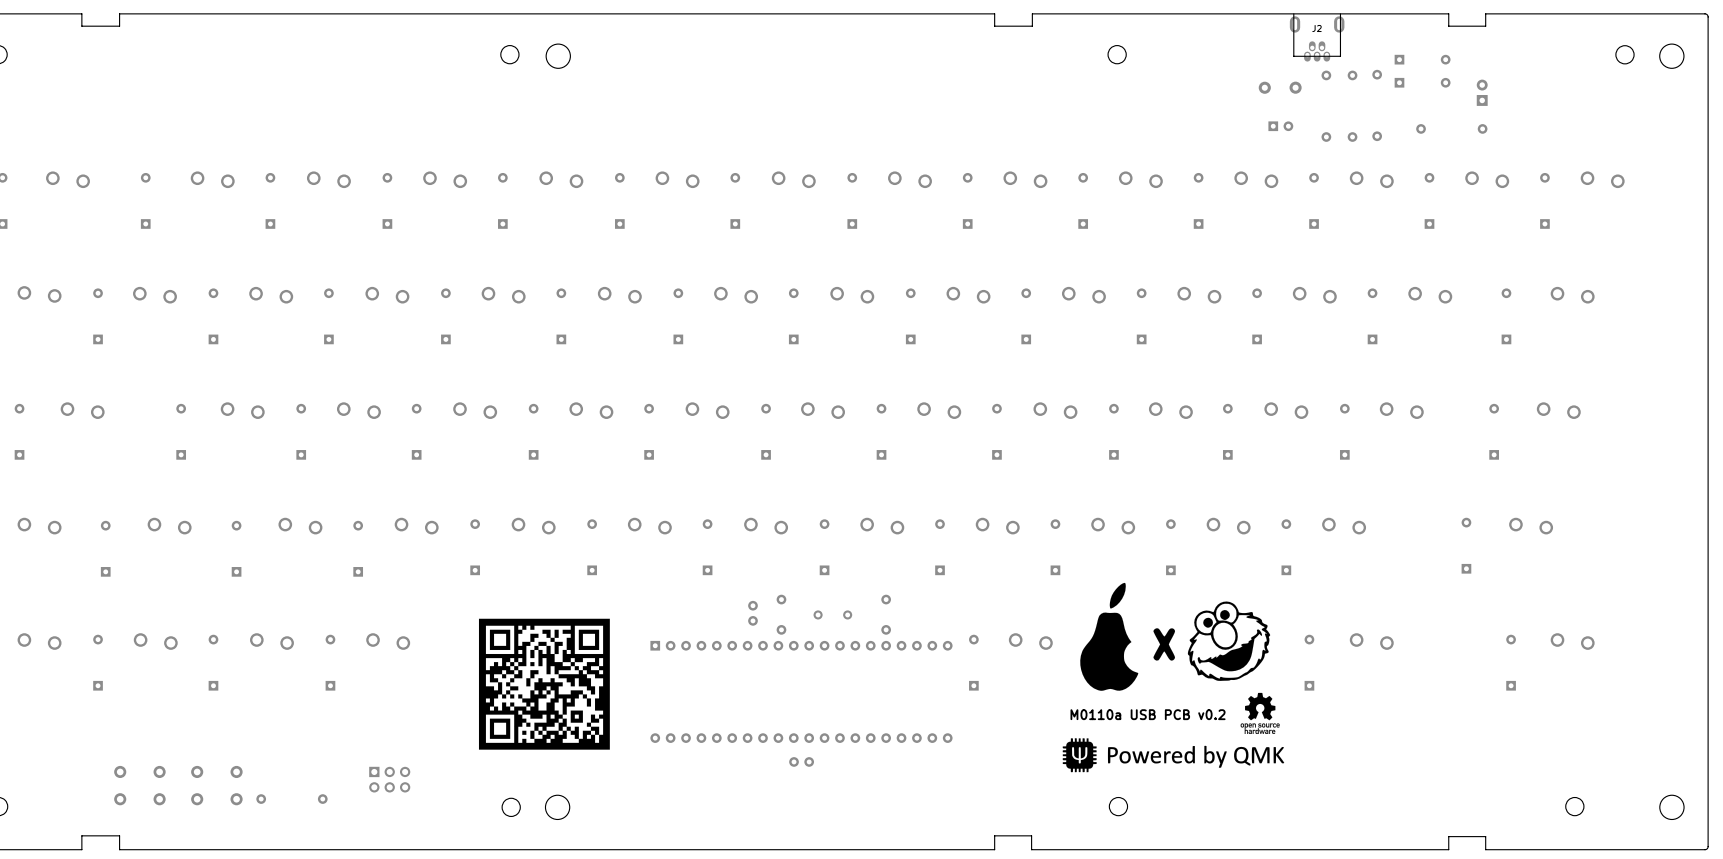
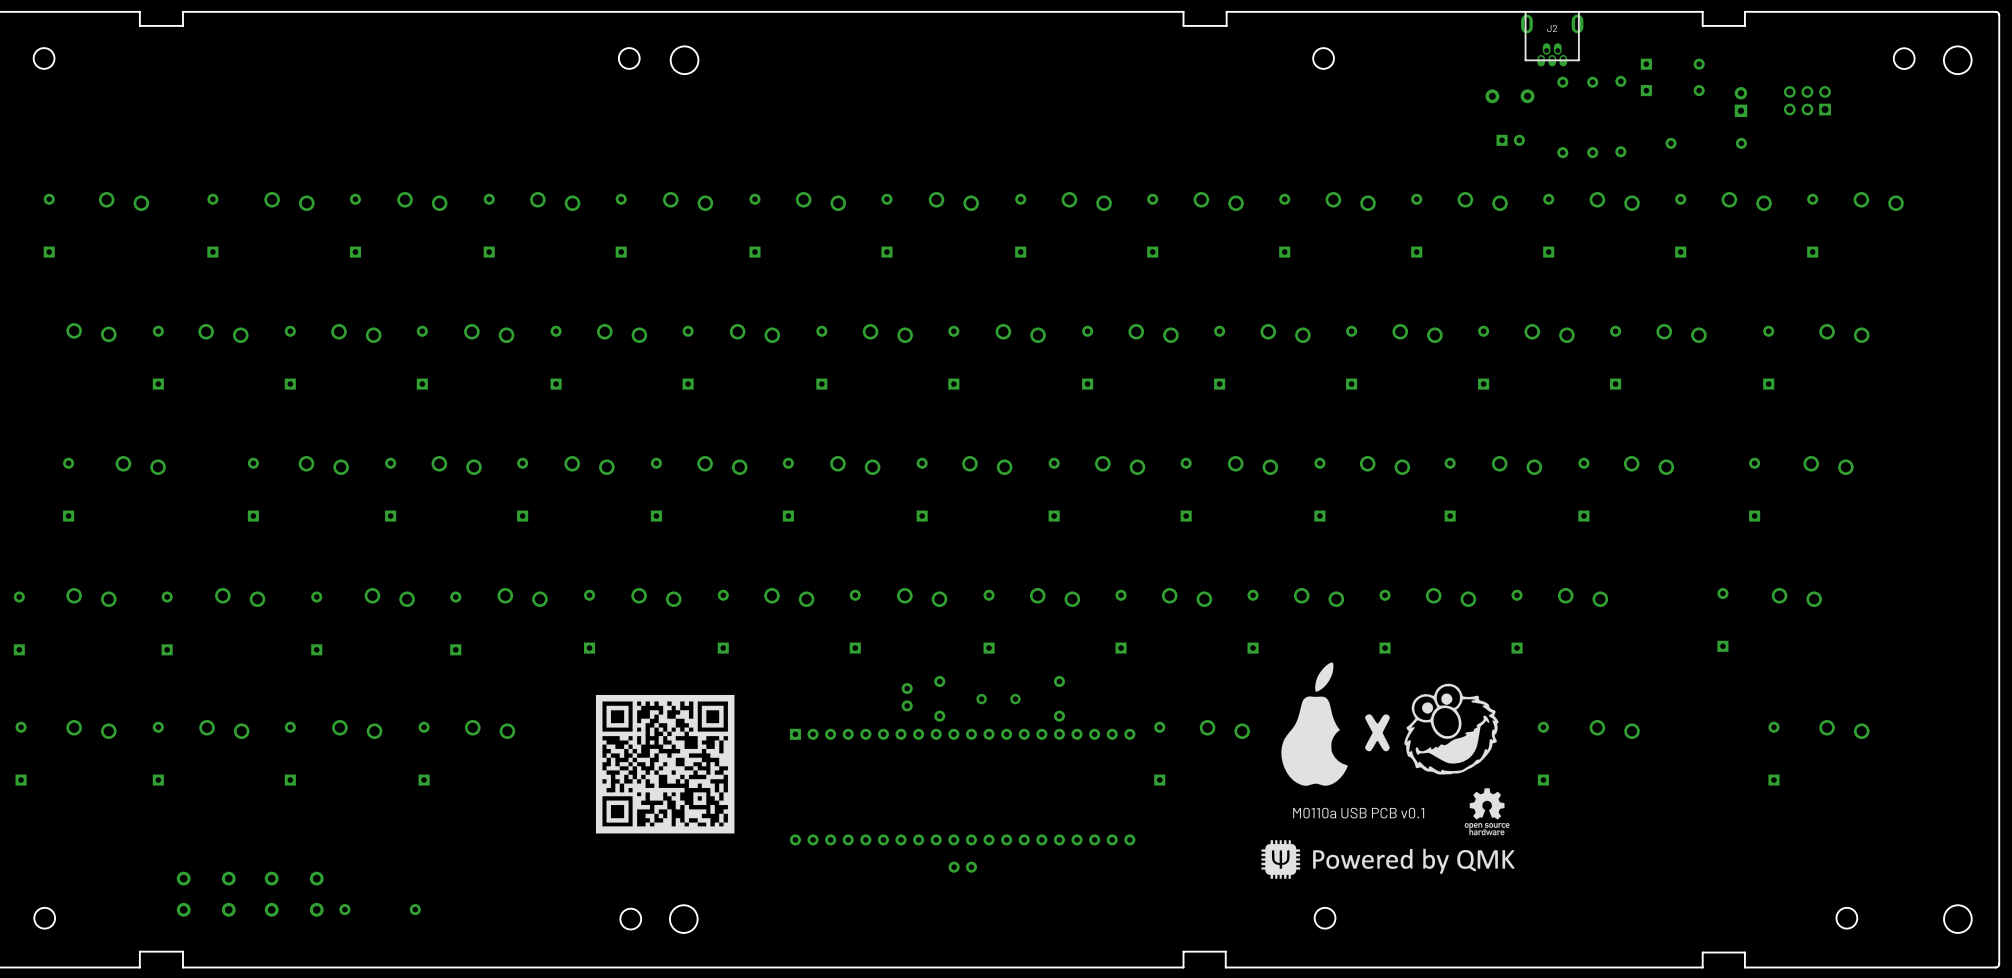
part: none -> (1807, 100)
drawing: none -> [595, 694, 735, 834]
drawing: [478, 618, 610, 750] -> none
text: M0110a USB PCB v0.2 (1148, 714) -> M0110a USB PCB v0.1 (1358, 813)
part: (389, 779) -> none

